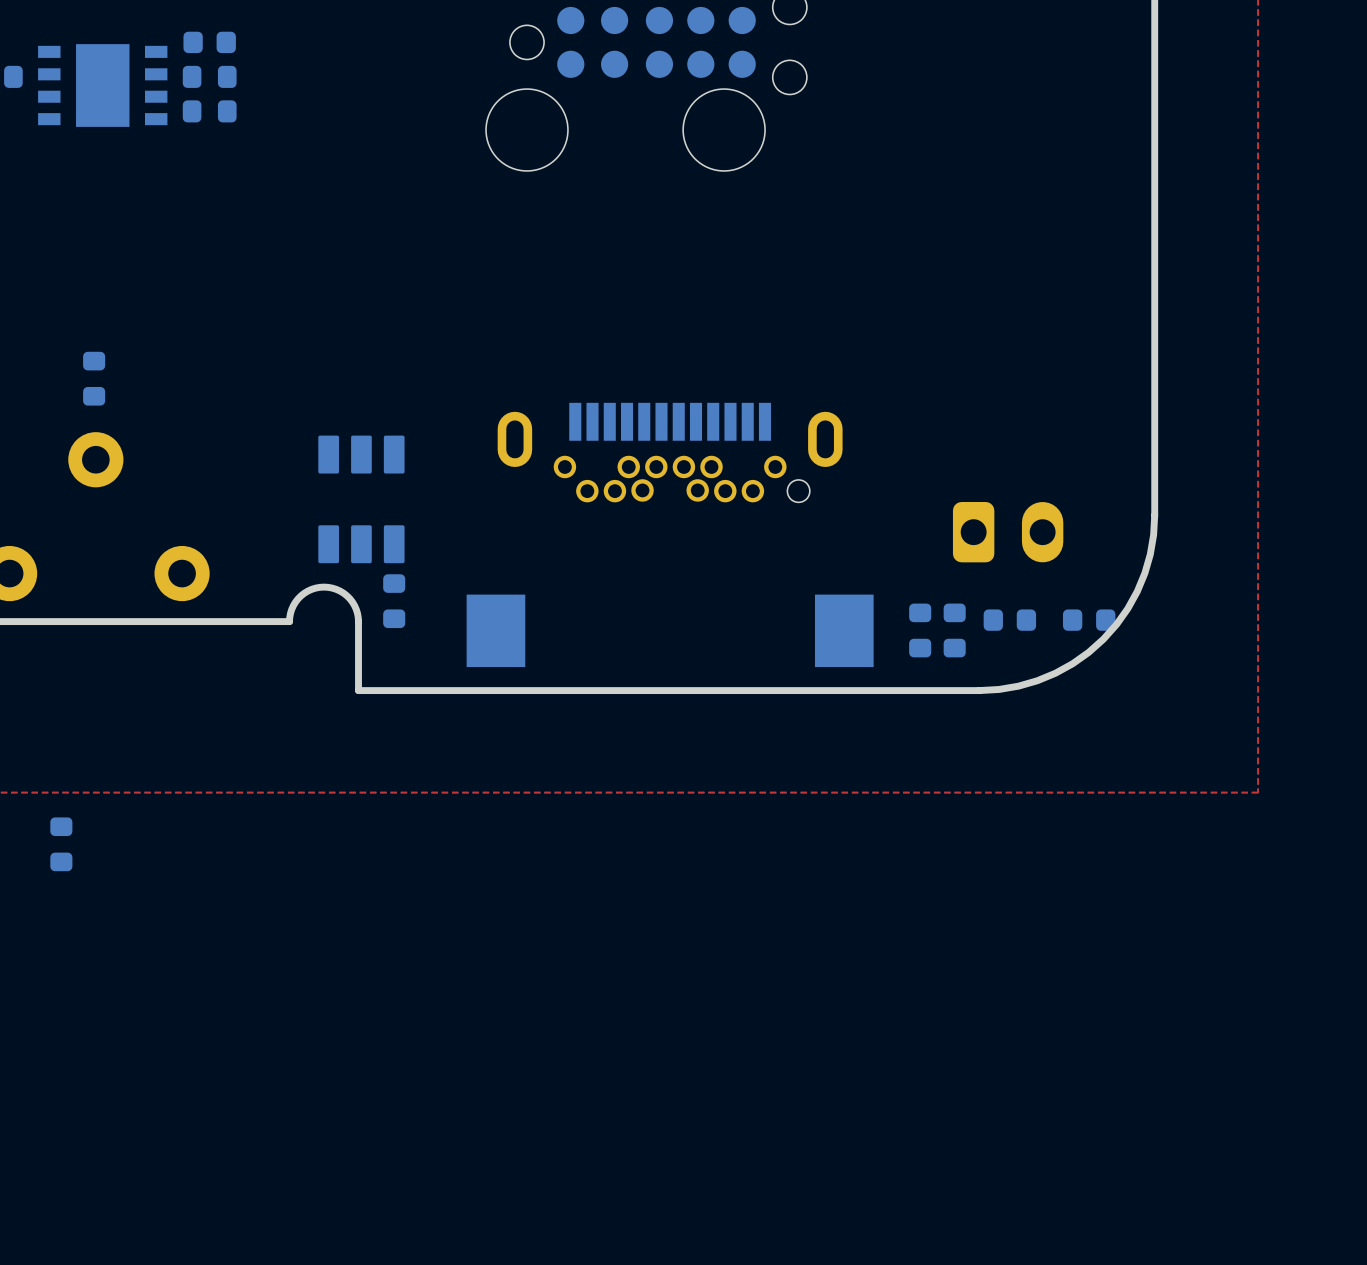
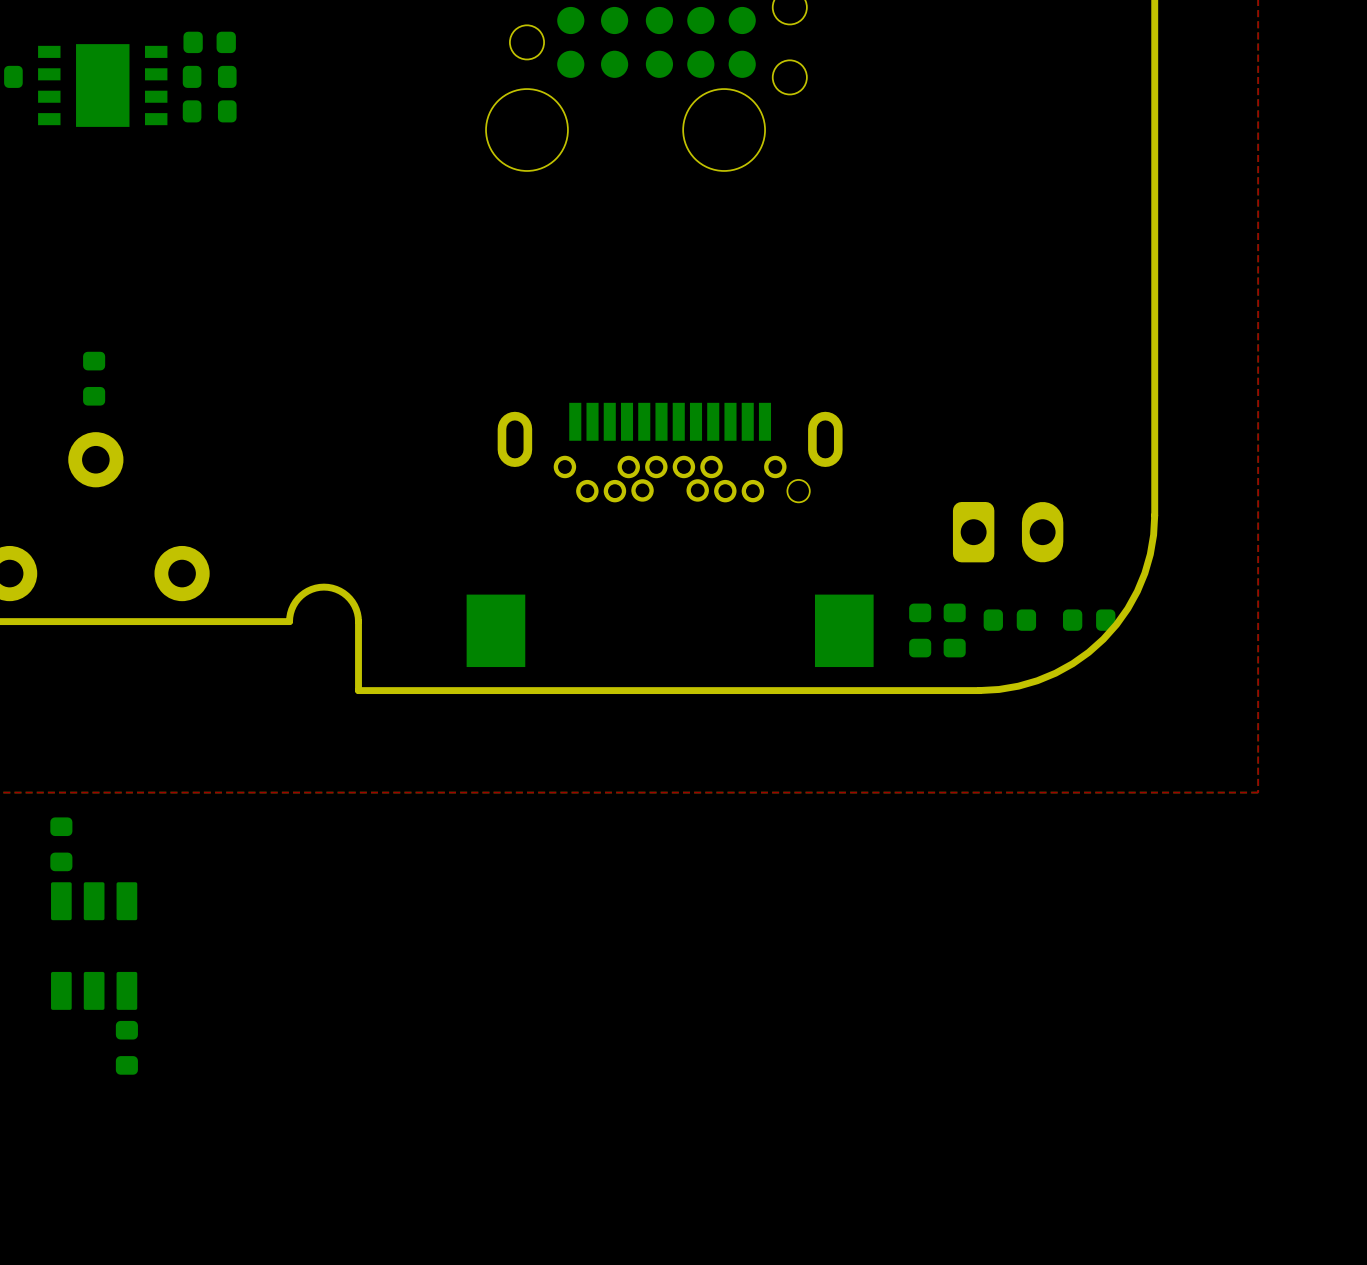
part position: (361, 499) -> (94, 946)
part position: (394, 601) -> (126, 1047)

